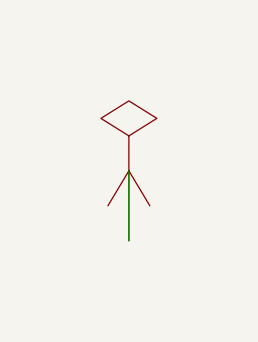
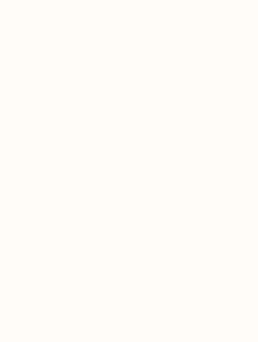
power symbol: (128, 135) -> none
wire: (128, 170) (128, 240) -> none
power symbol: (128, 205) -> none

